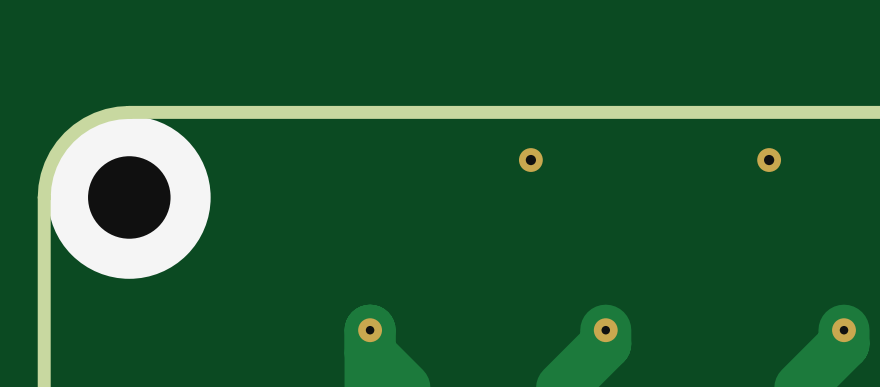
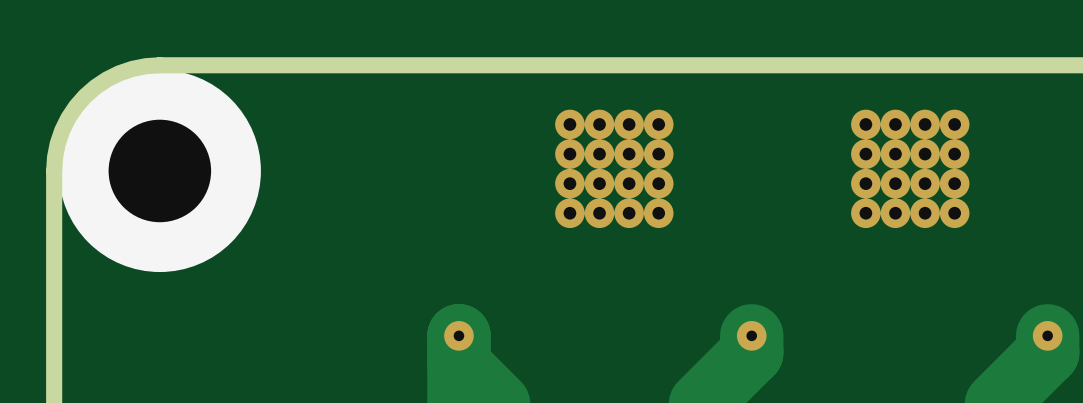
via: none -> (569, 124)
via: none -> (599, 124)
via: none -> (629, 124)
via: none -> (865, 124)
via: none -> (895, 124)
via: none -> (925, 124)
via: none -> (569, 154)
via: none -> (599, 154)
via: none -> (629, 154)
via: none -> (658, 154)
via: none -> (865, 154)
via: none -> (895, 154)
via: none -> (925, 154)
via: none -> (954, 154)
via: none -> (569, 183)
via: none -> (599, 183)
via: none -> (629, 183)
via: none -> (658, 183)
via: none -> (865, 183)
via: none -> (895, 183)
via: none -> (925, 183)
via: none -> (954, 183)
via: none -> (569, 213)
via: none -> (599, 213)
via: none -> (629, 213)
via: none -> (658, 213)
via: none -> (865, 213)
via: none -> (895, 213)
via: none -> (925, 213)
via: none -> (954, 213)

